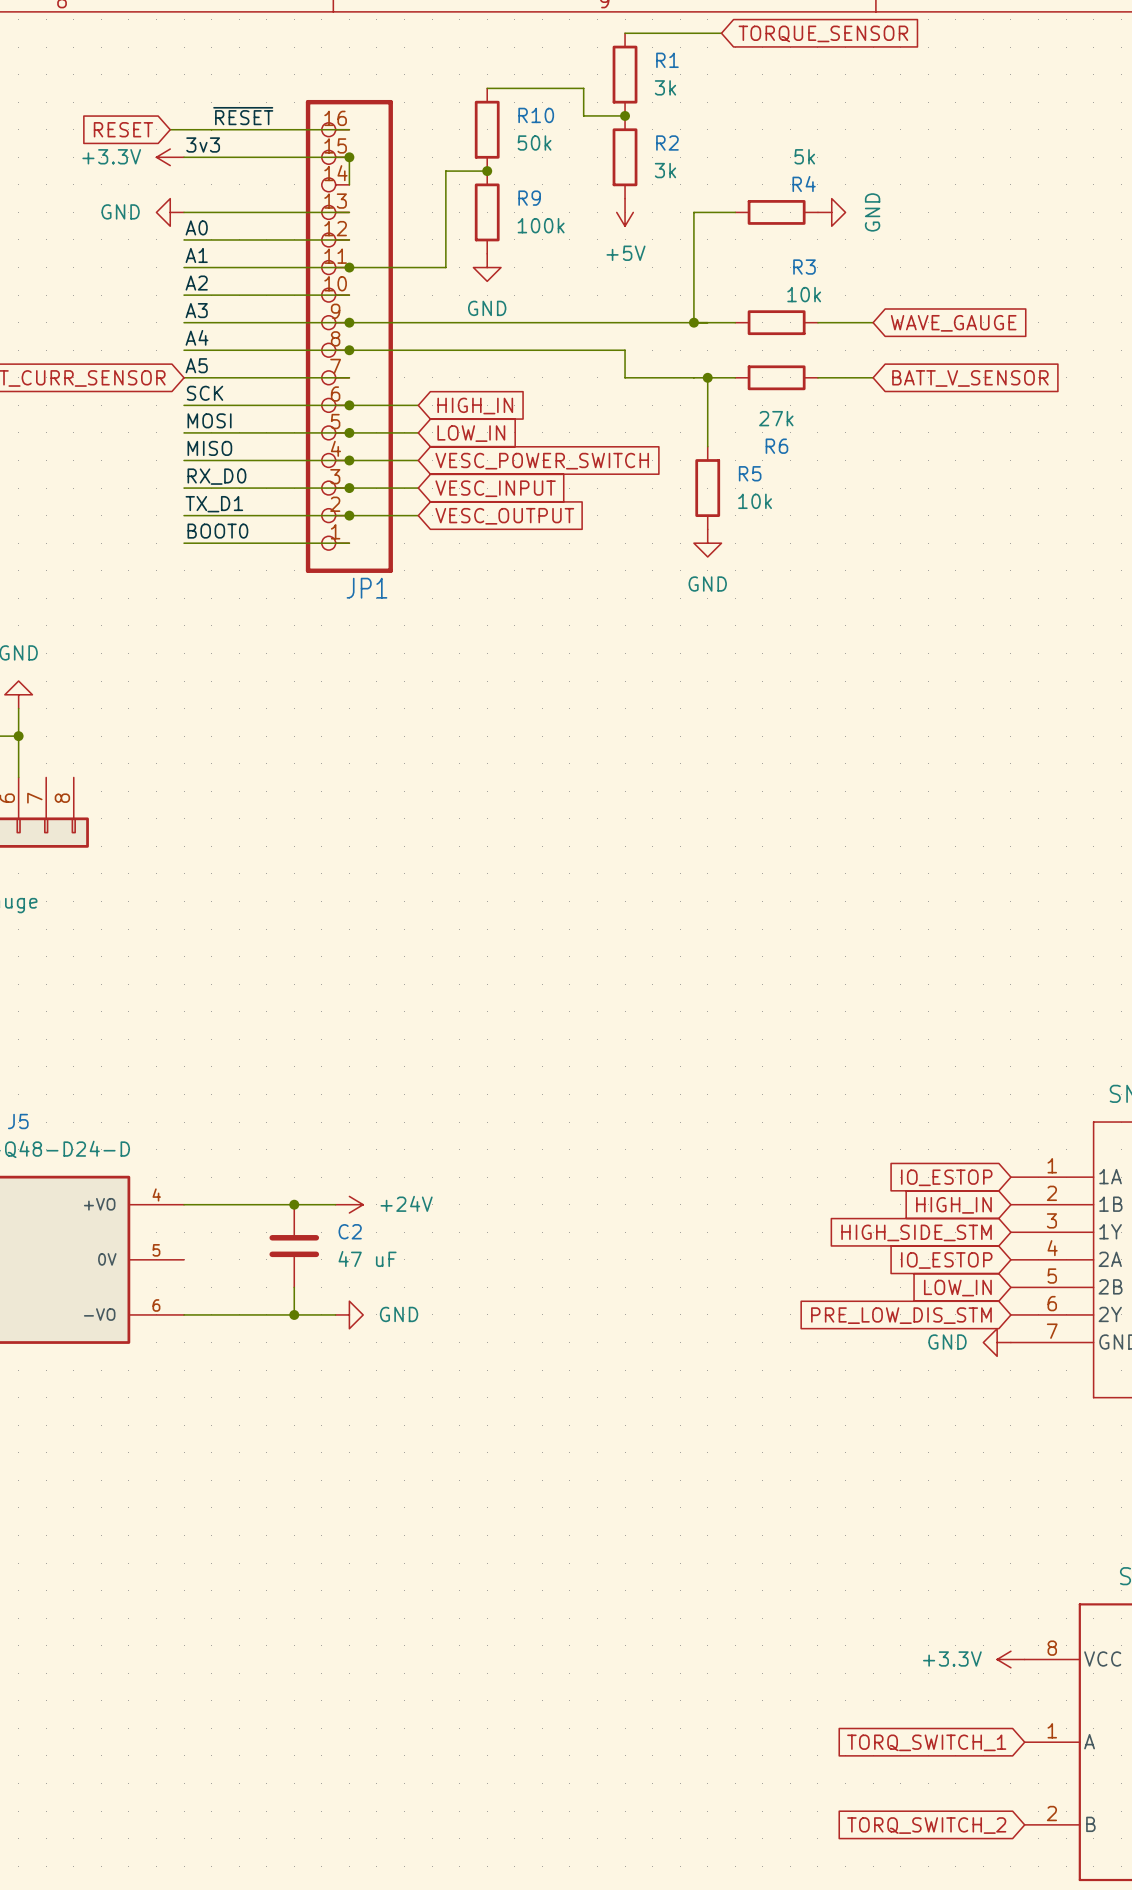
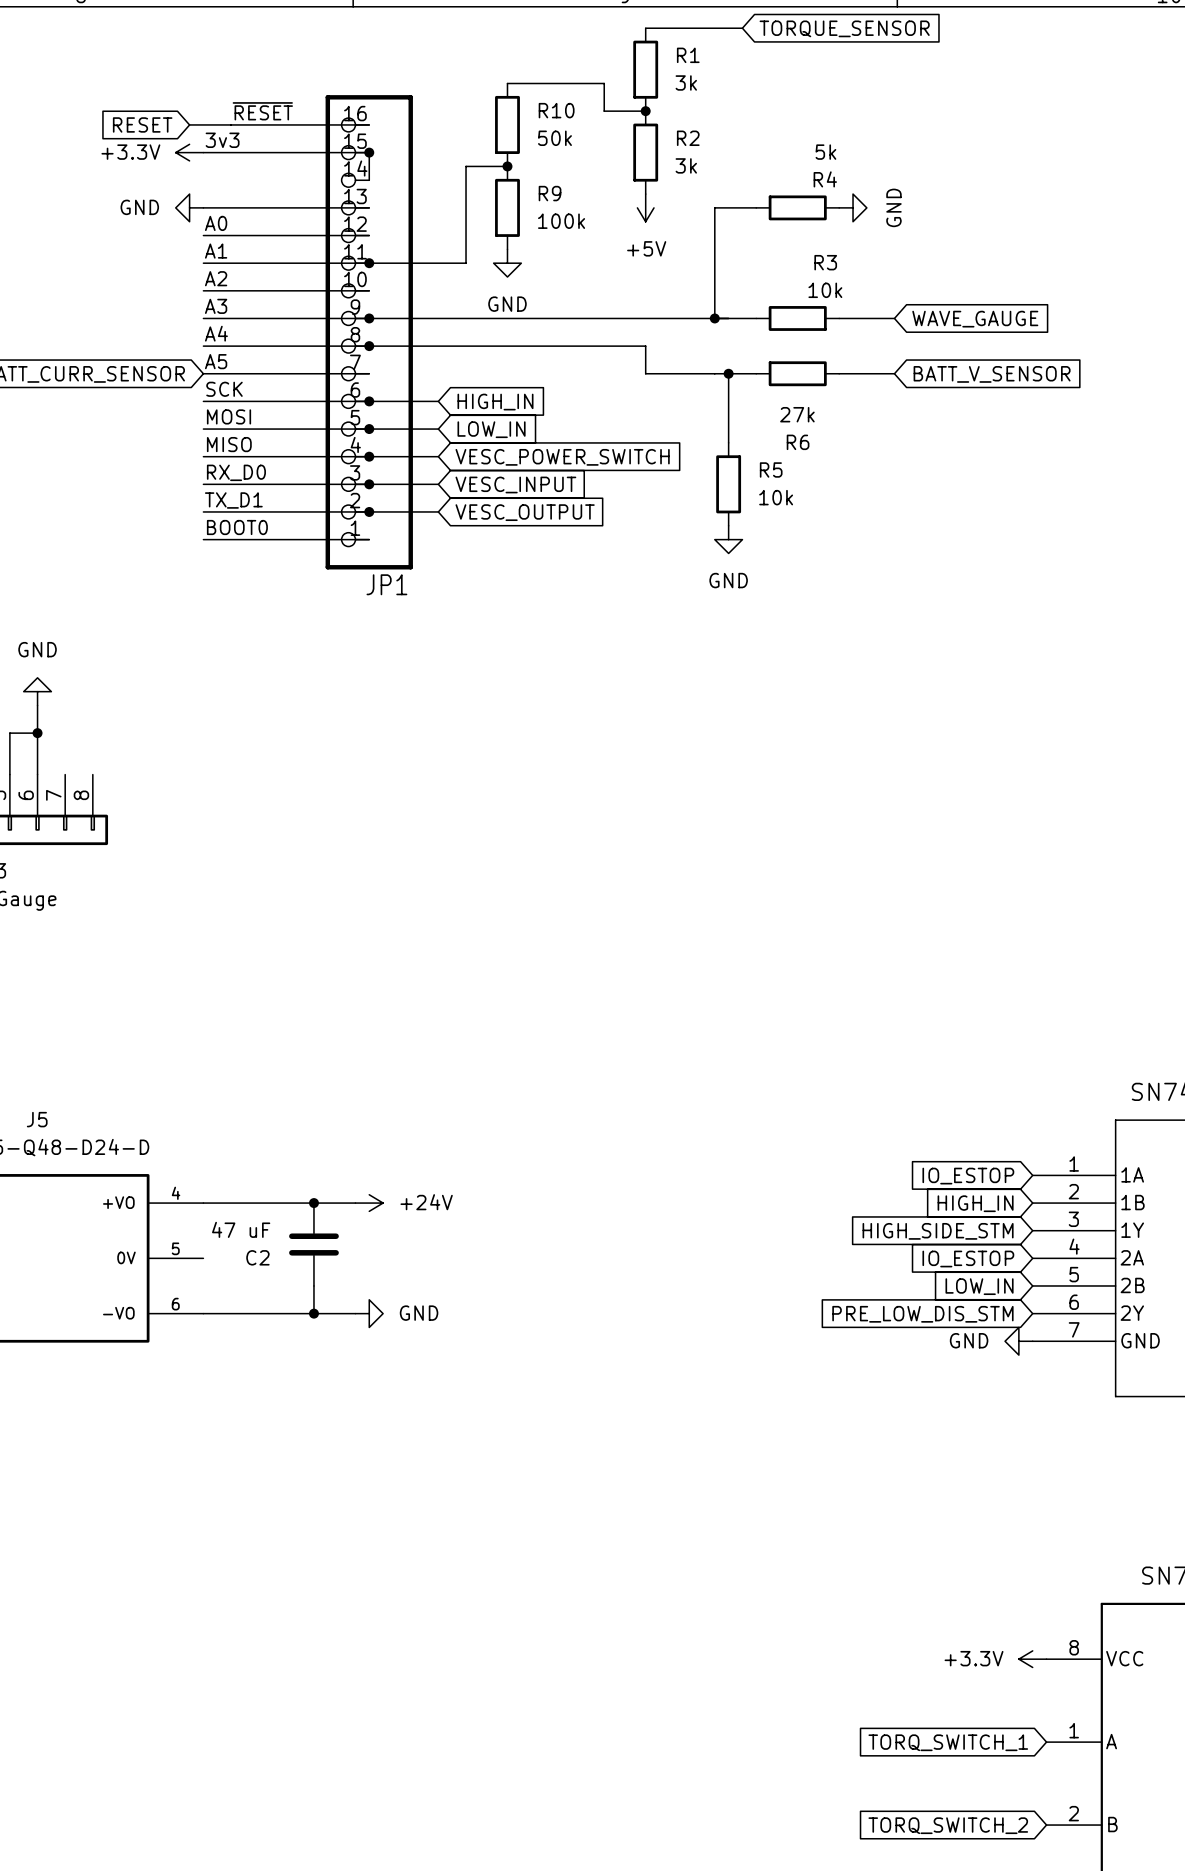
C2 name position: C2 (350, 1231) -> C2 (257, 1257)
C2 value position: 47 uF (367, 1258) -> 47 uF (241, 1229)

